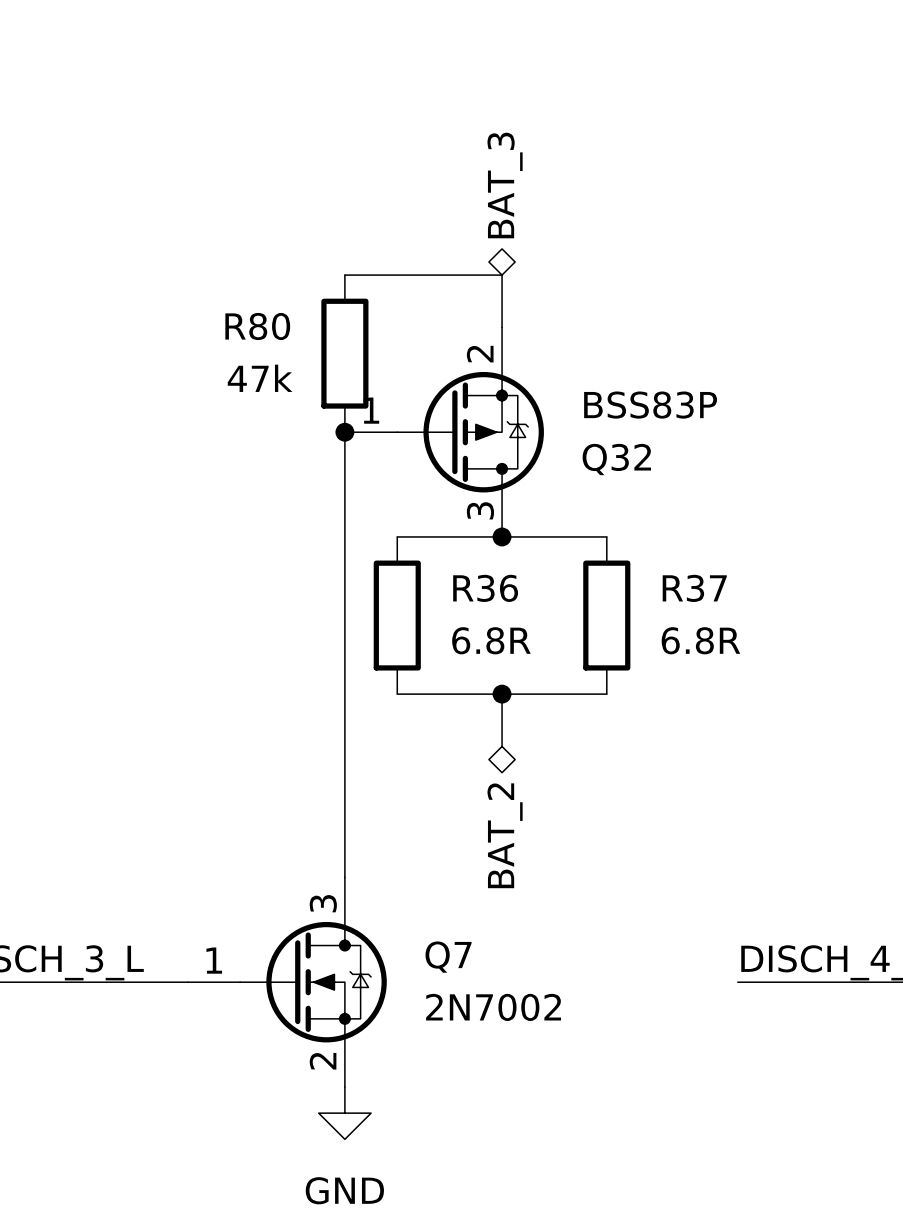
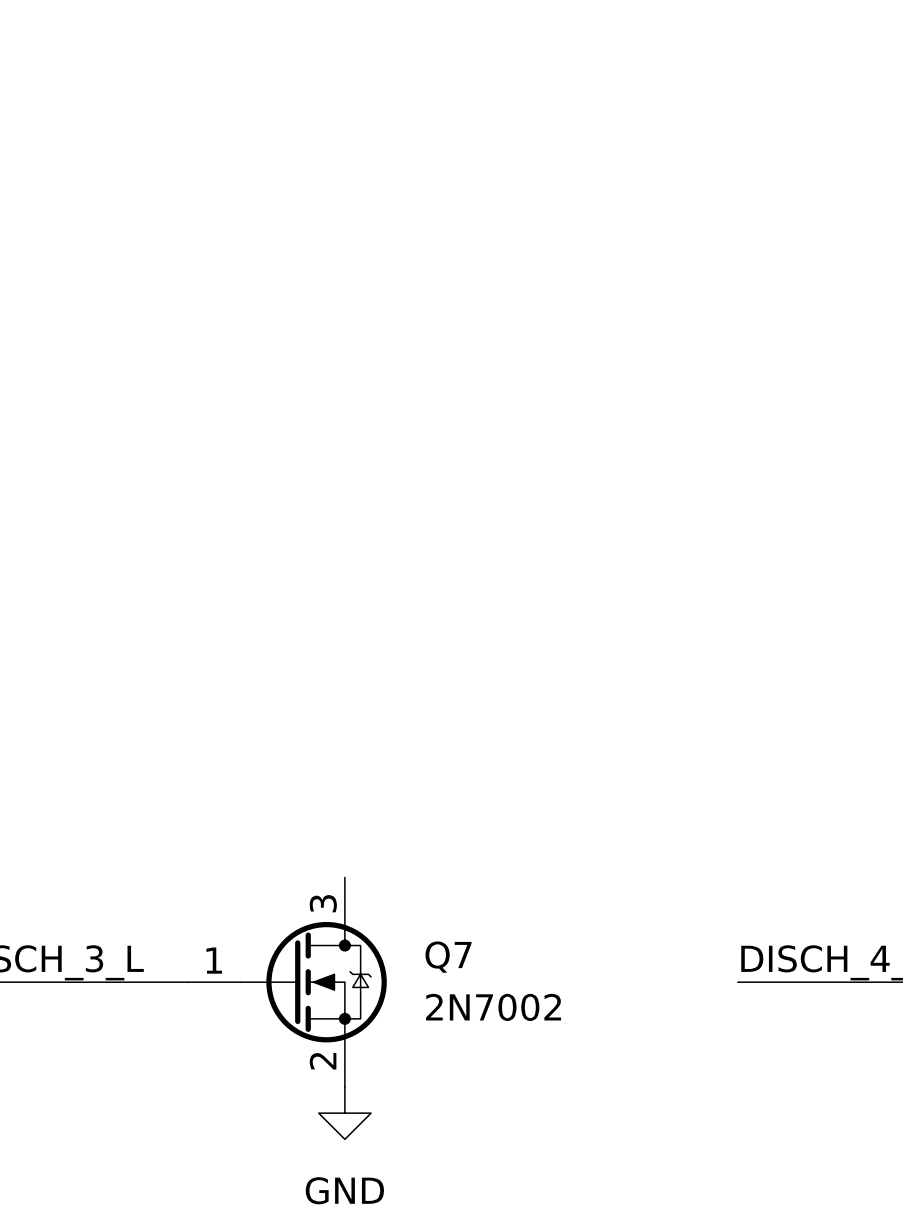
hierarchical label: BAT_3 (505, 185) -> none
wire: (344, 275) (502, 275) (502, 327) -> none
R80: 47k (344, 353) -> none
wire: (344, 432) (344, 877) -> none
junction: (344, 432) -> none
Q32: BSS83P (444, 432) -> none
wire: (397, 536) (606, 536) -> none
junction: (502, 536) -> none
R36: 6.8R (397, 615) -> none
R37: 6.8R (606, 615) -> none
wire: (397, 694) (606, 694) -> none
wire: (502, 694) (502, 746) -> none
junction: (502, 694) -> none
hierarchical label: BAT_2 (505, 835) -> none

